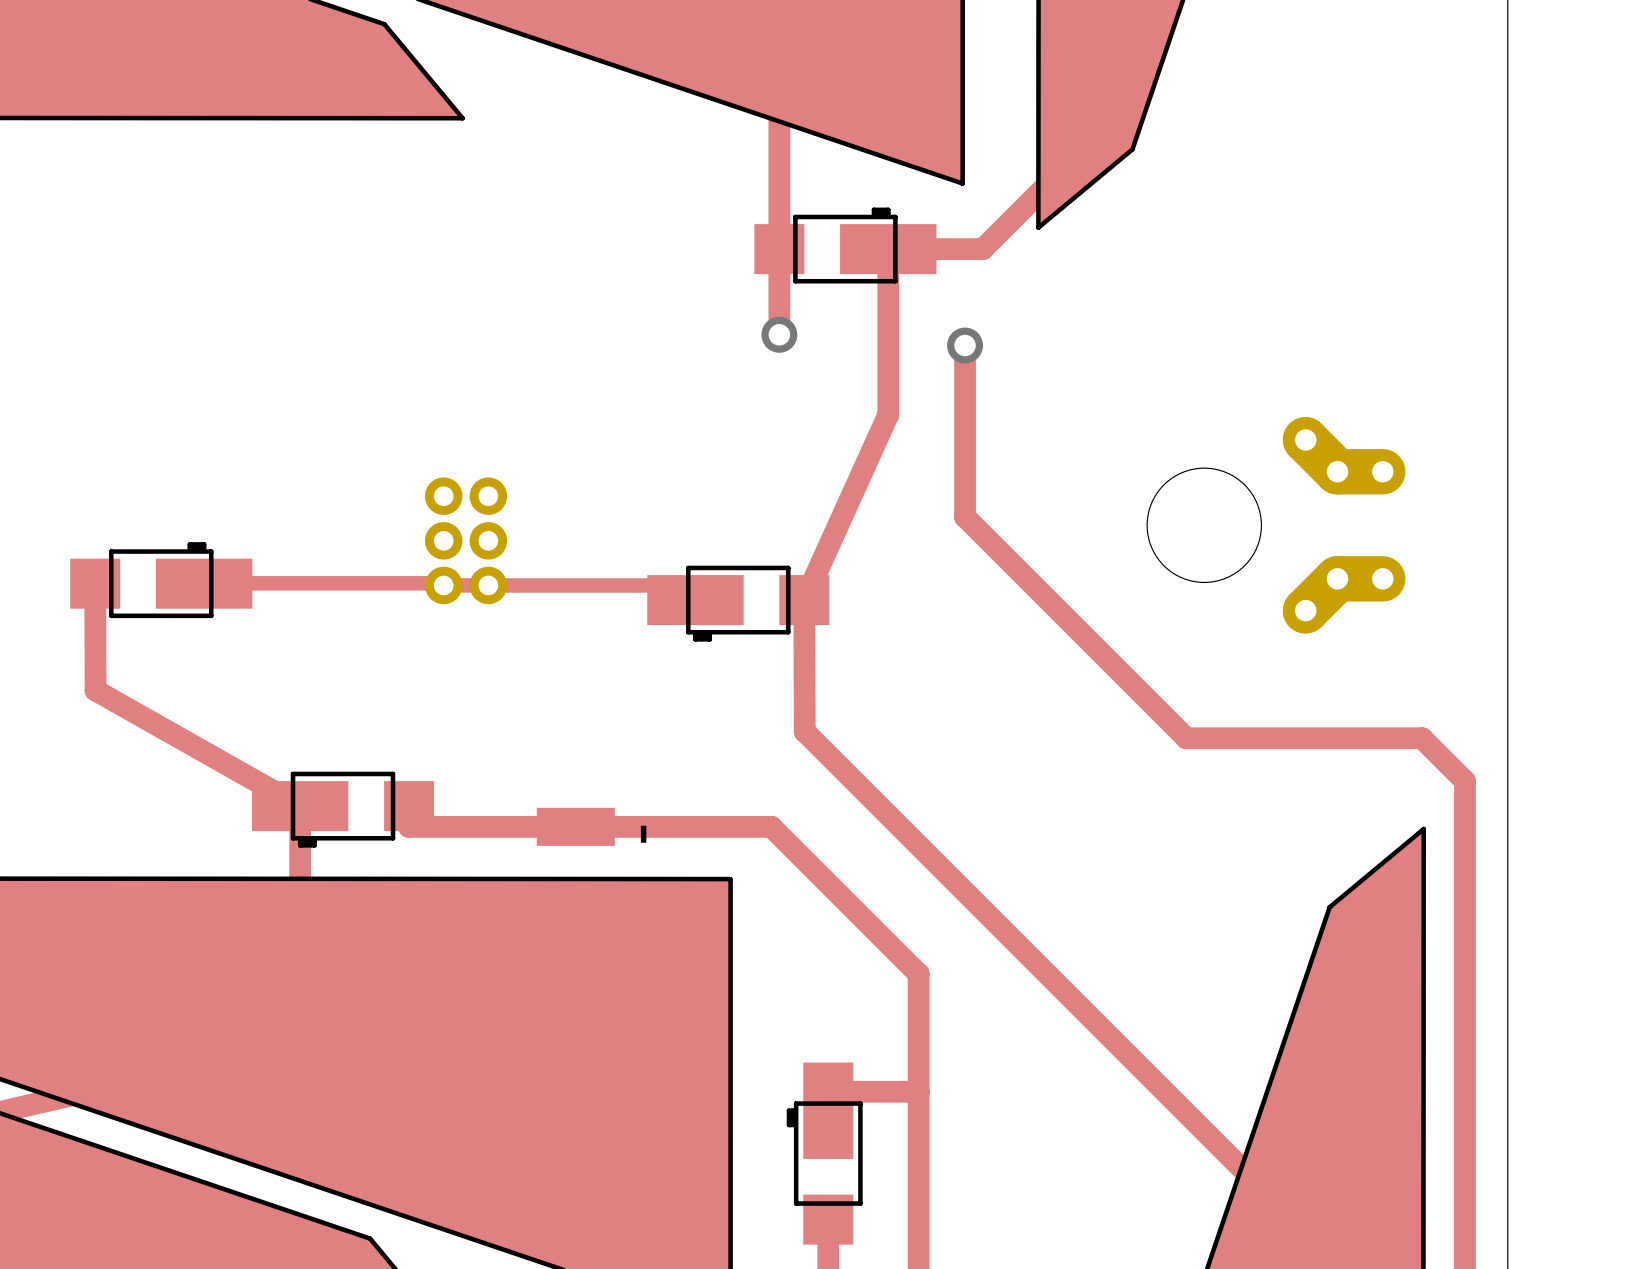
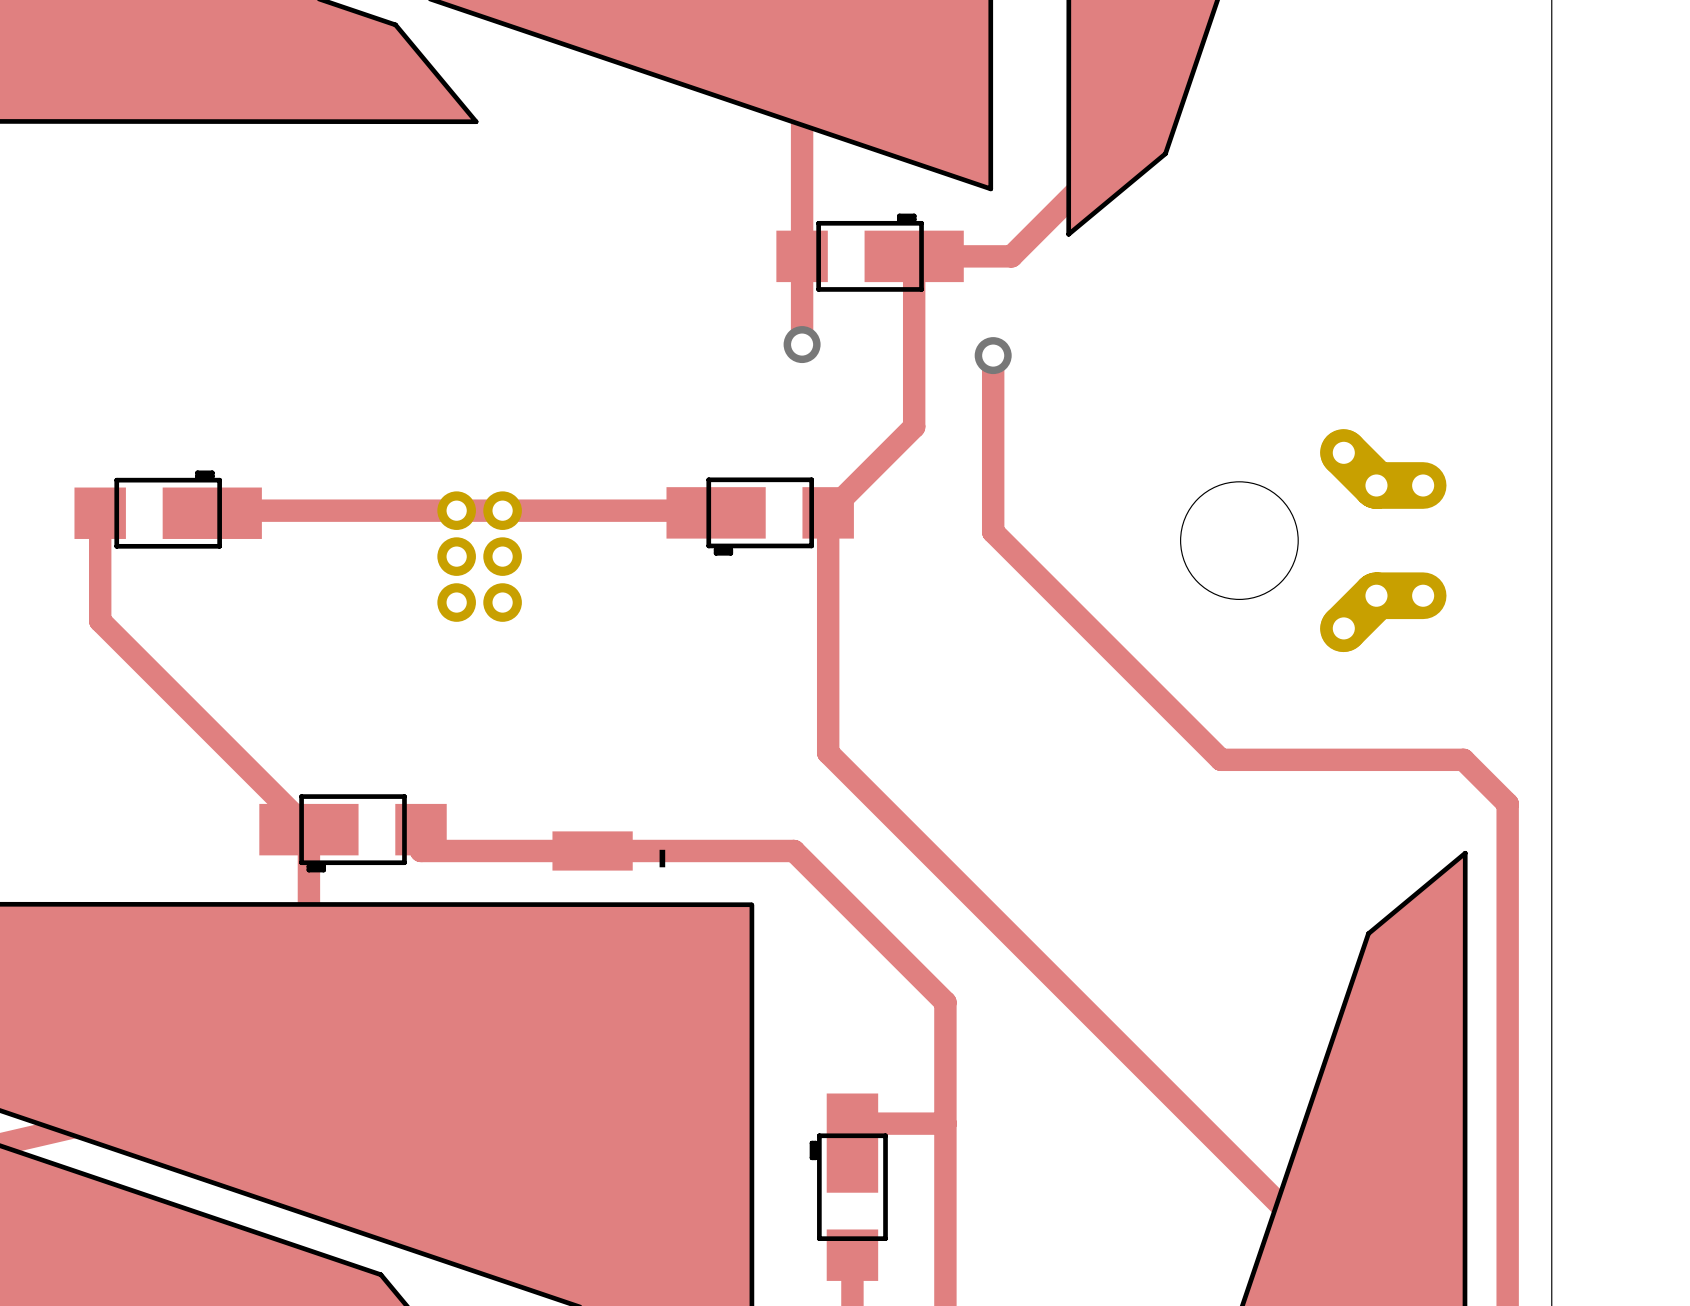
track: (888, 414) (804, 600) (804, 731) -> (914, 426) (828, 512) (828, 752)
track: none -> (716, 512) (713, 510) (214, 510) (212, 513)
part position: (161, 580) -> (168, 509)
track: (95, 583) (95, 690) (300, 806) -> (100, 513) (100, 620) (308, 829)
track: (204, 583) (695, 585) (695, 600) (685, 596) -> none
part position: (738, 603) -> (760, 516)

